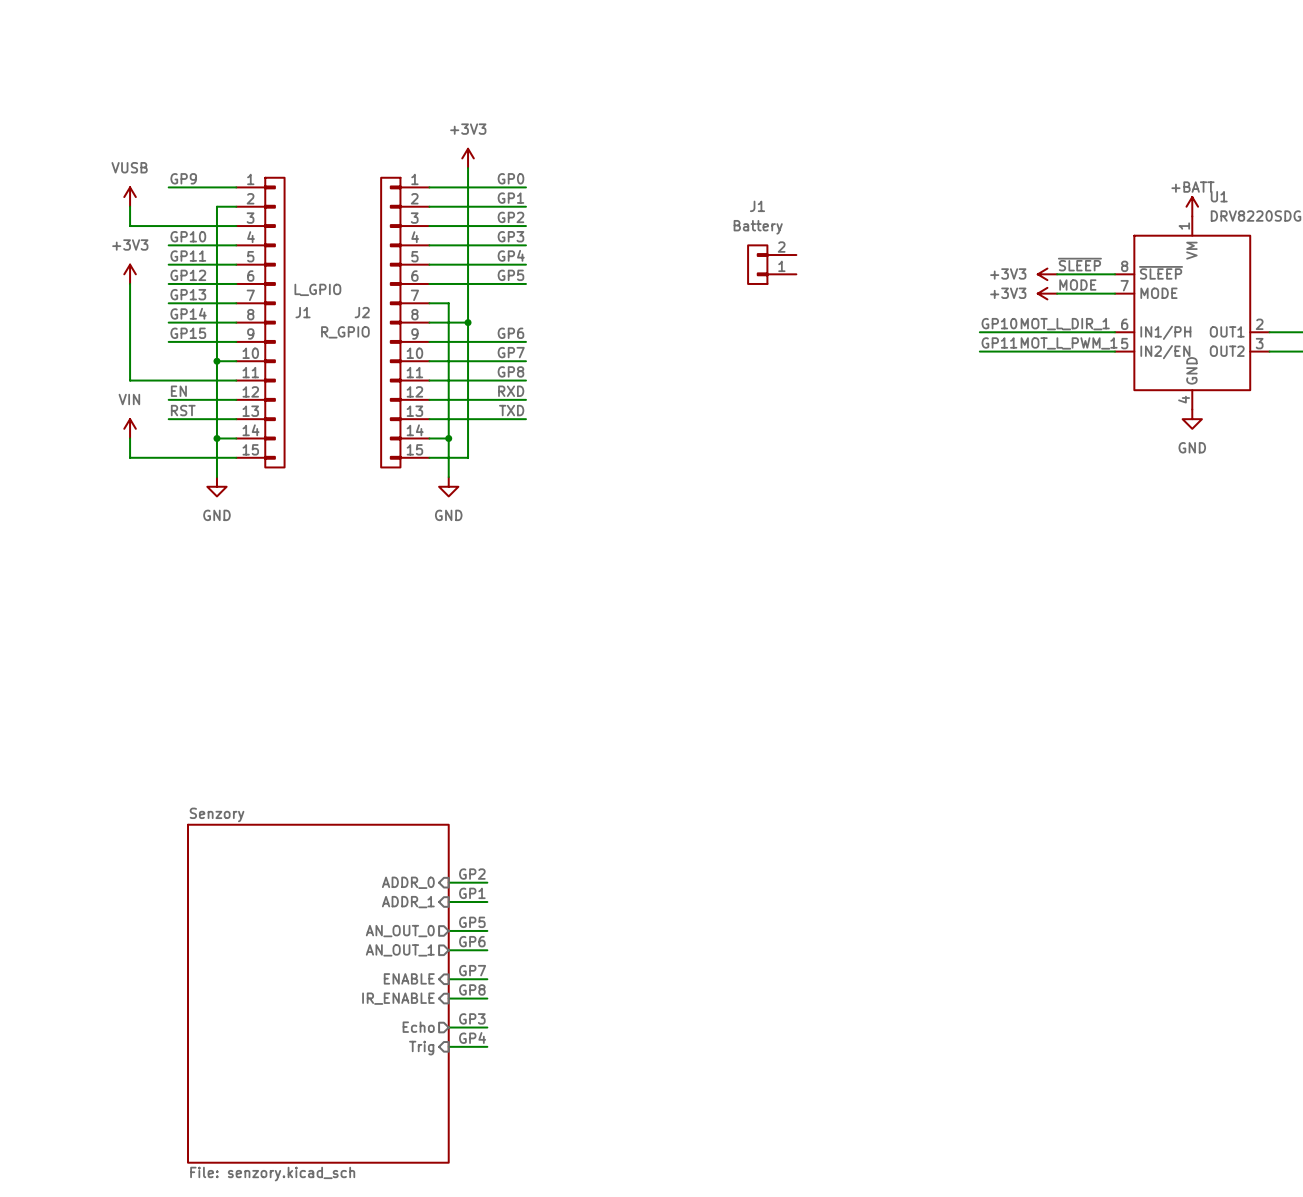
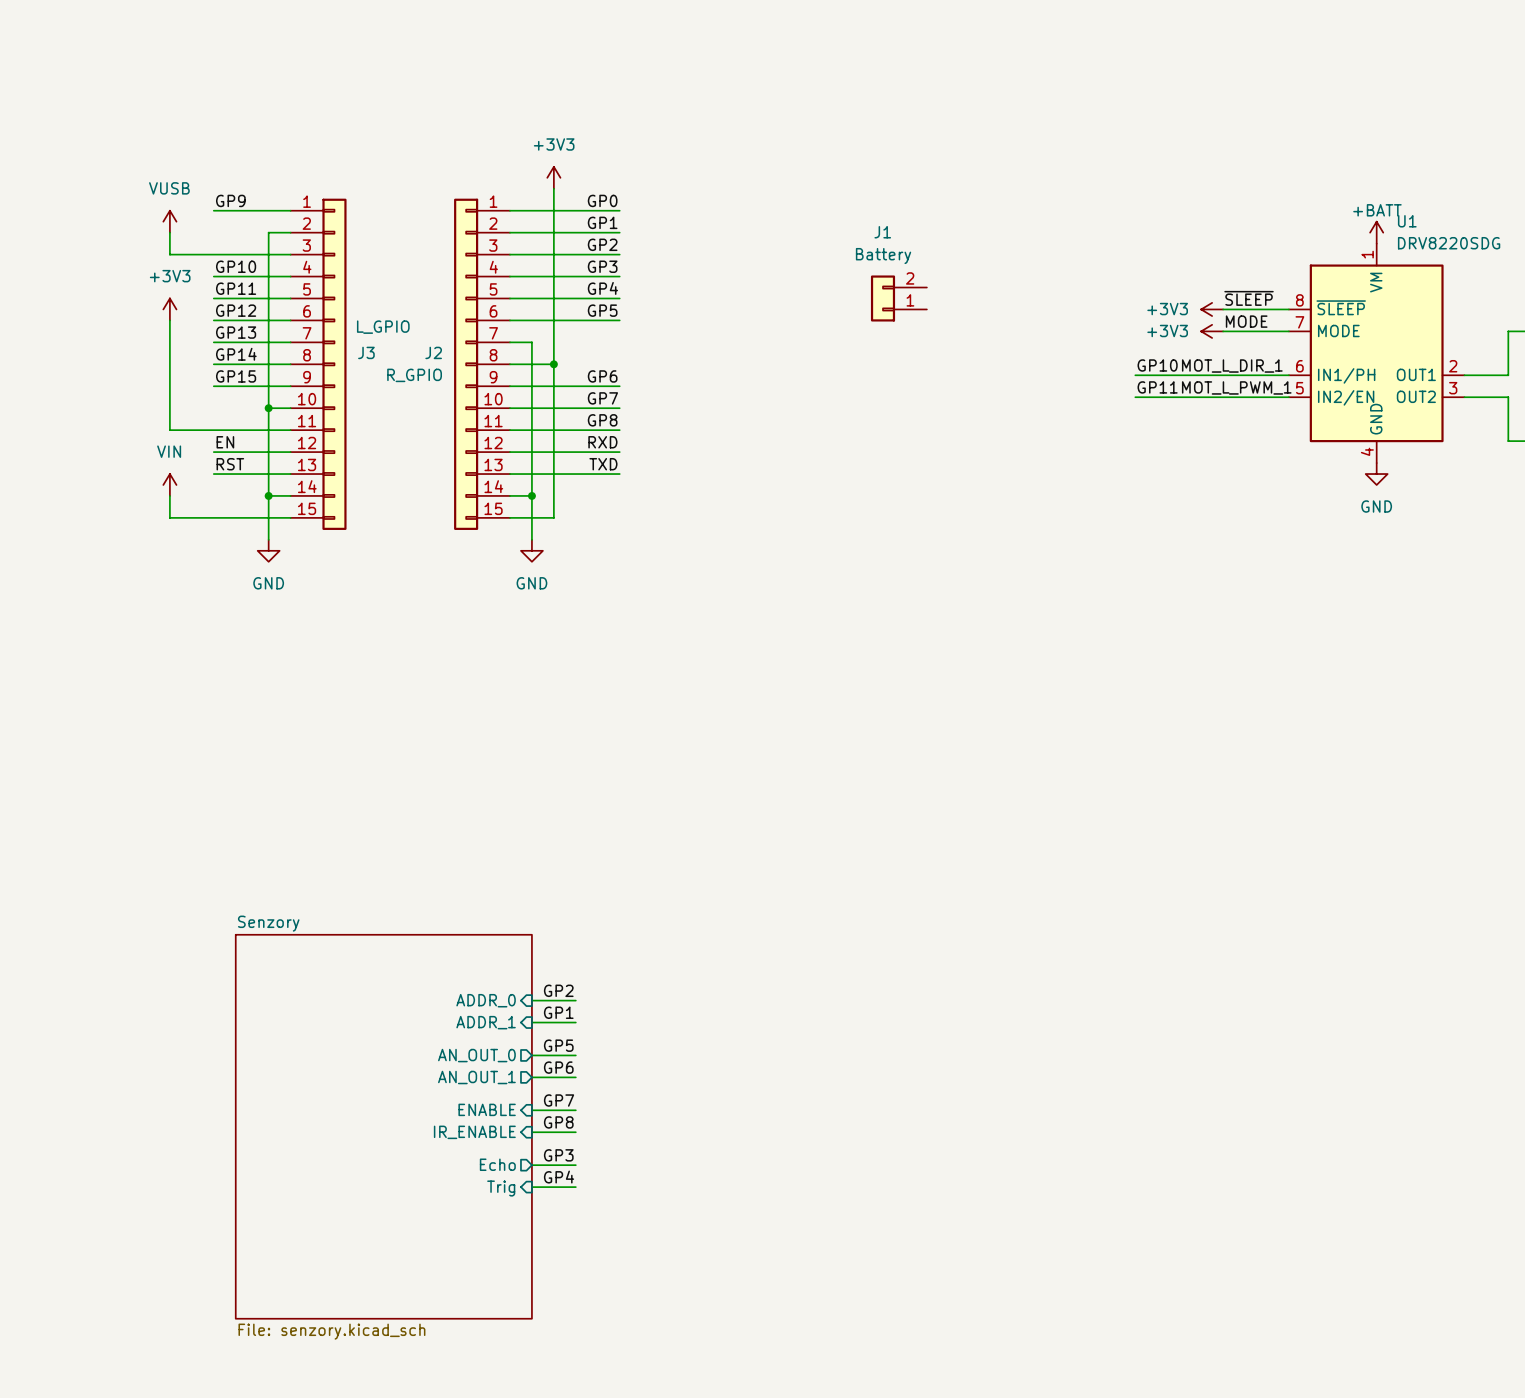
J1 name: J1 (303, 312) -> J3 (366, 352)

